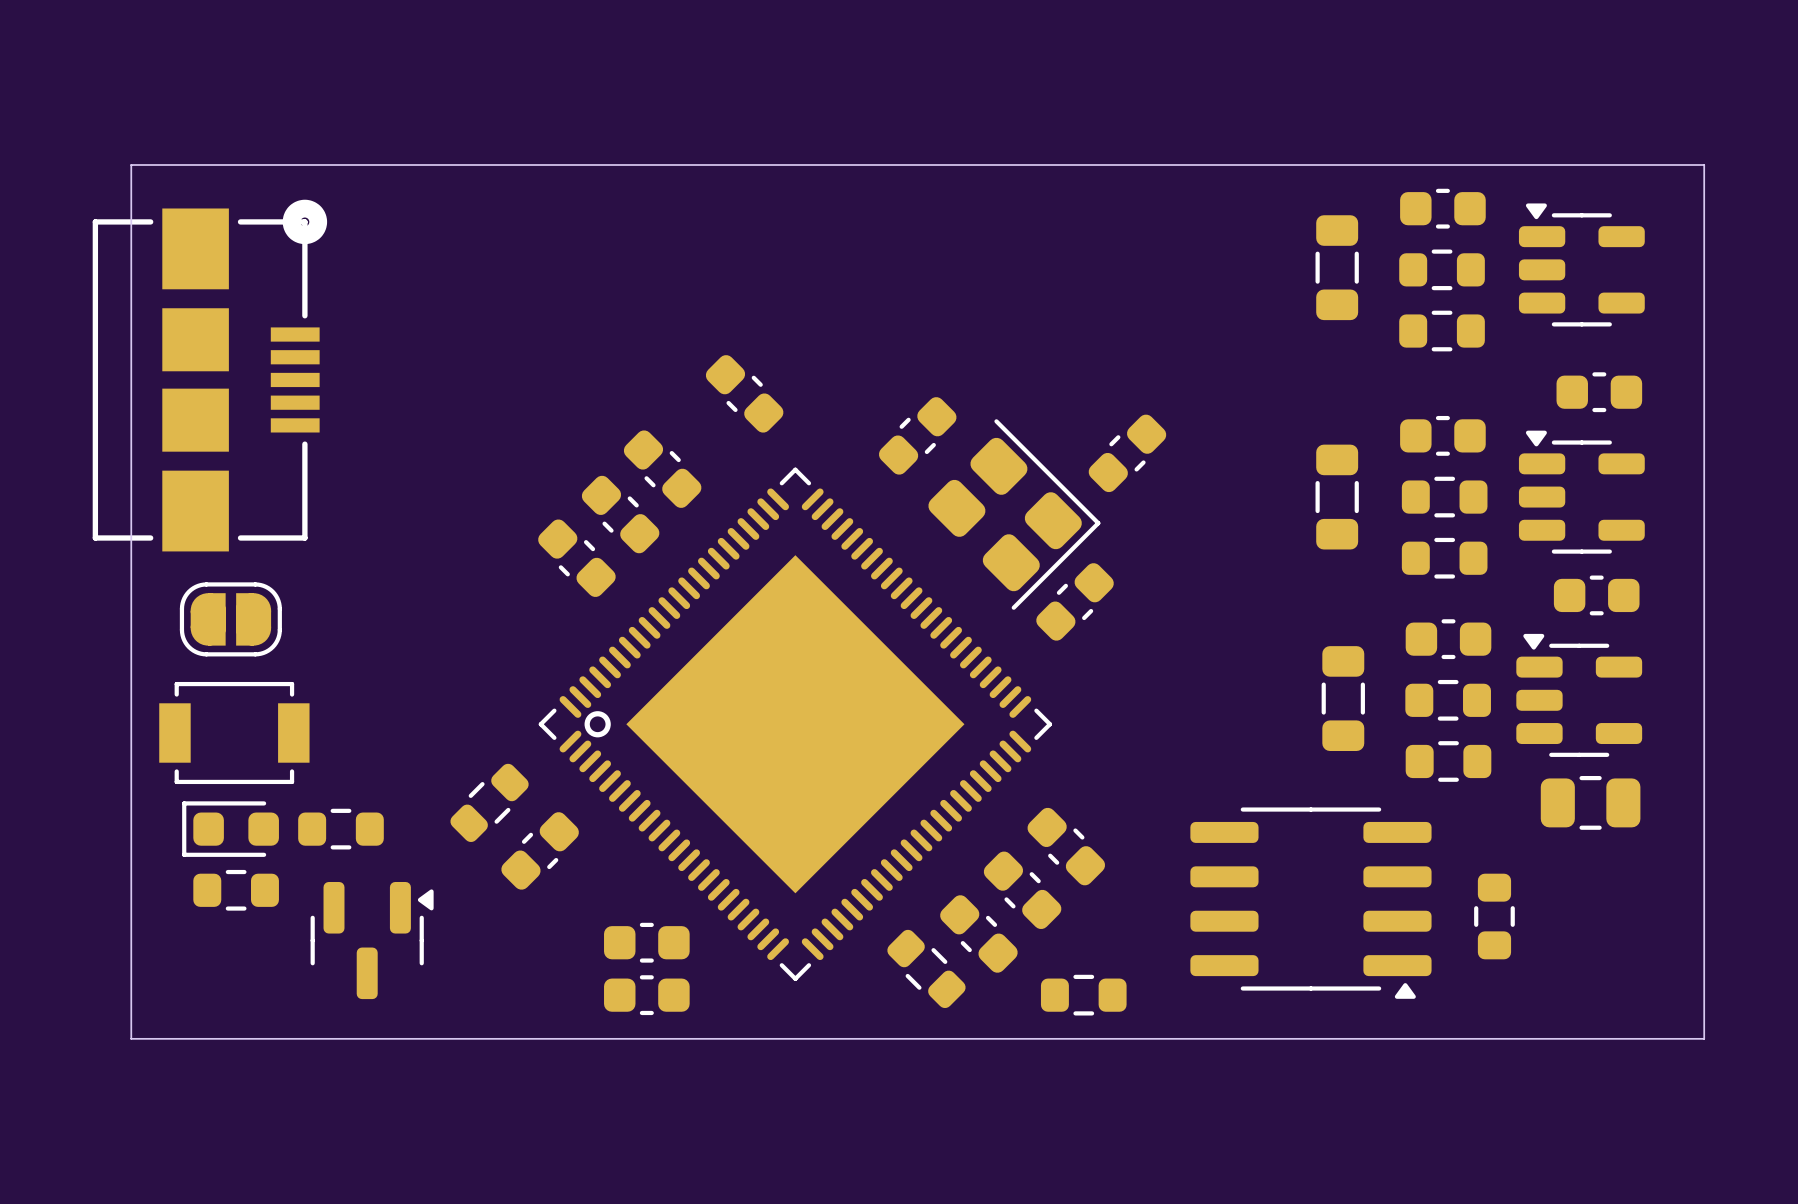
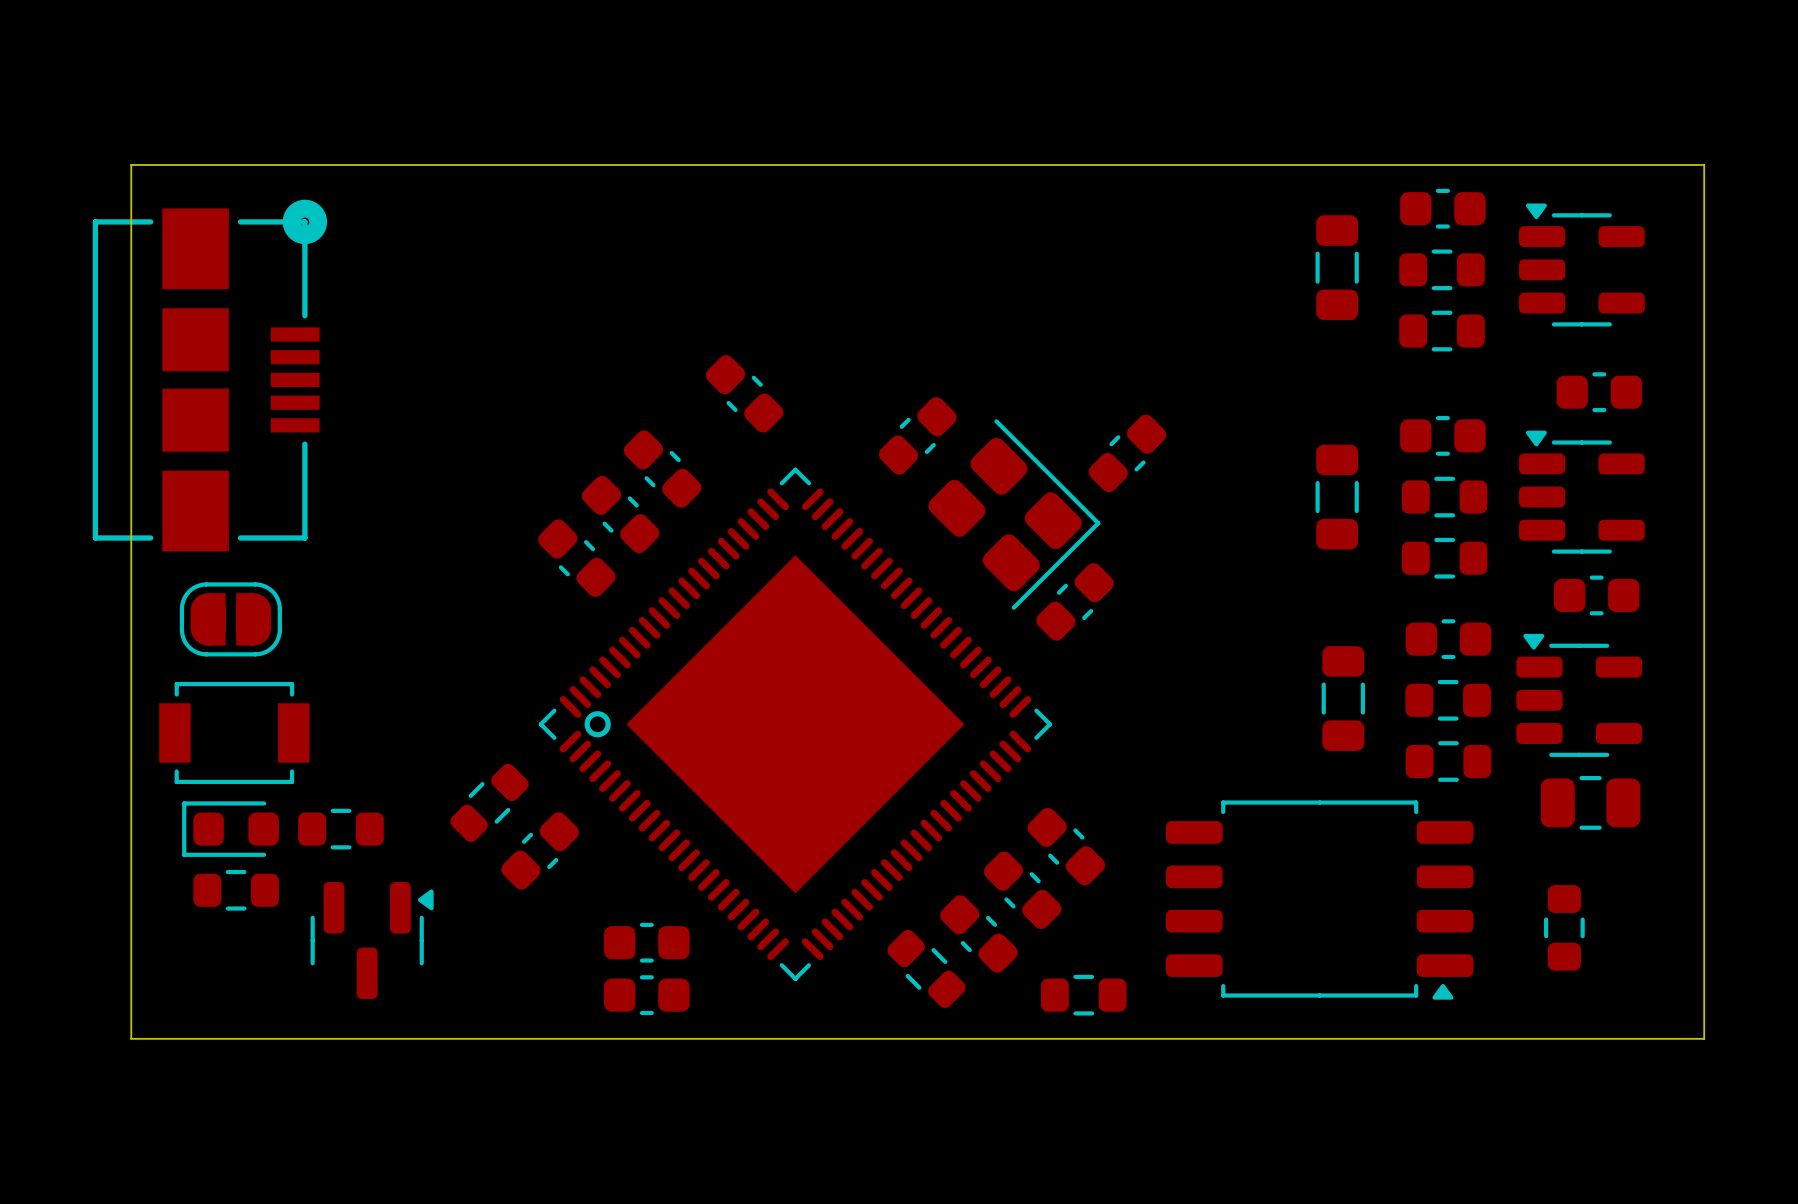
part footprint: [1190, 807, 1432, 999] -> [1165, 800, 1474, 1000]
part position: (1494, 916) -> (1564, 927)

